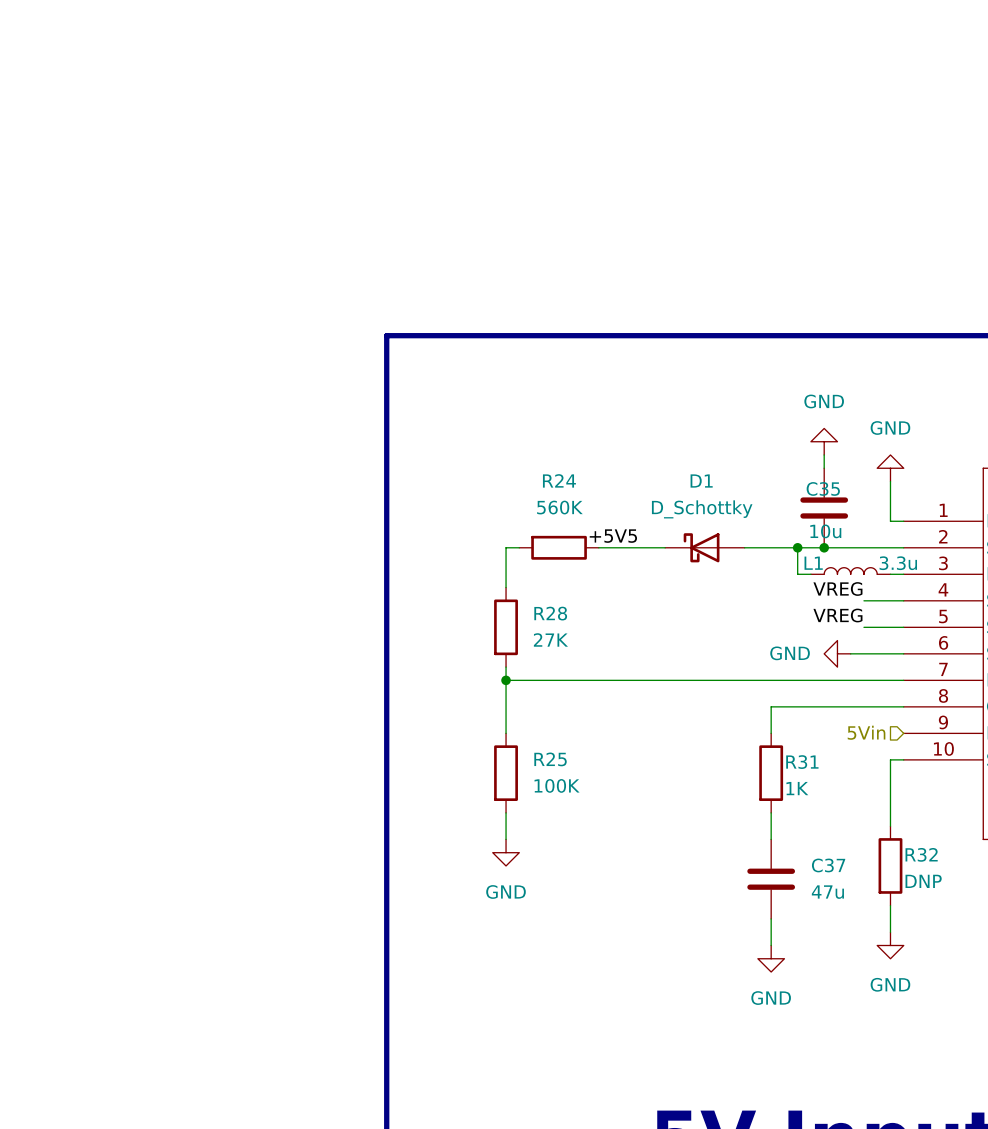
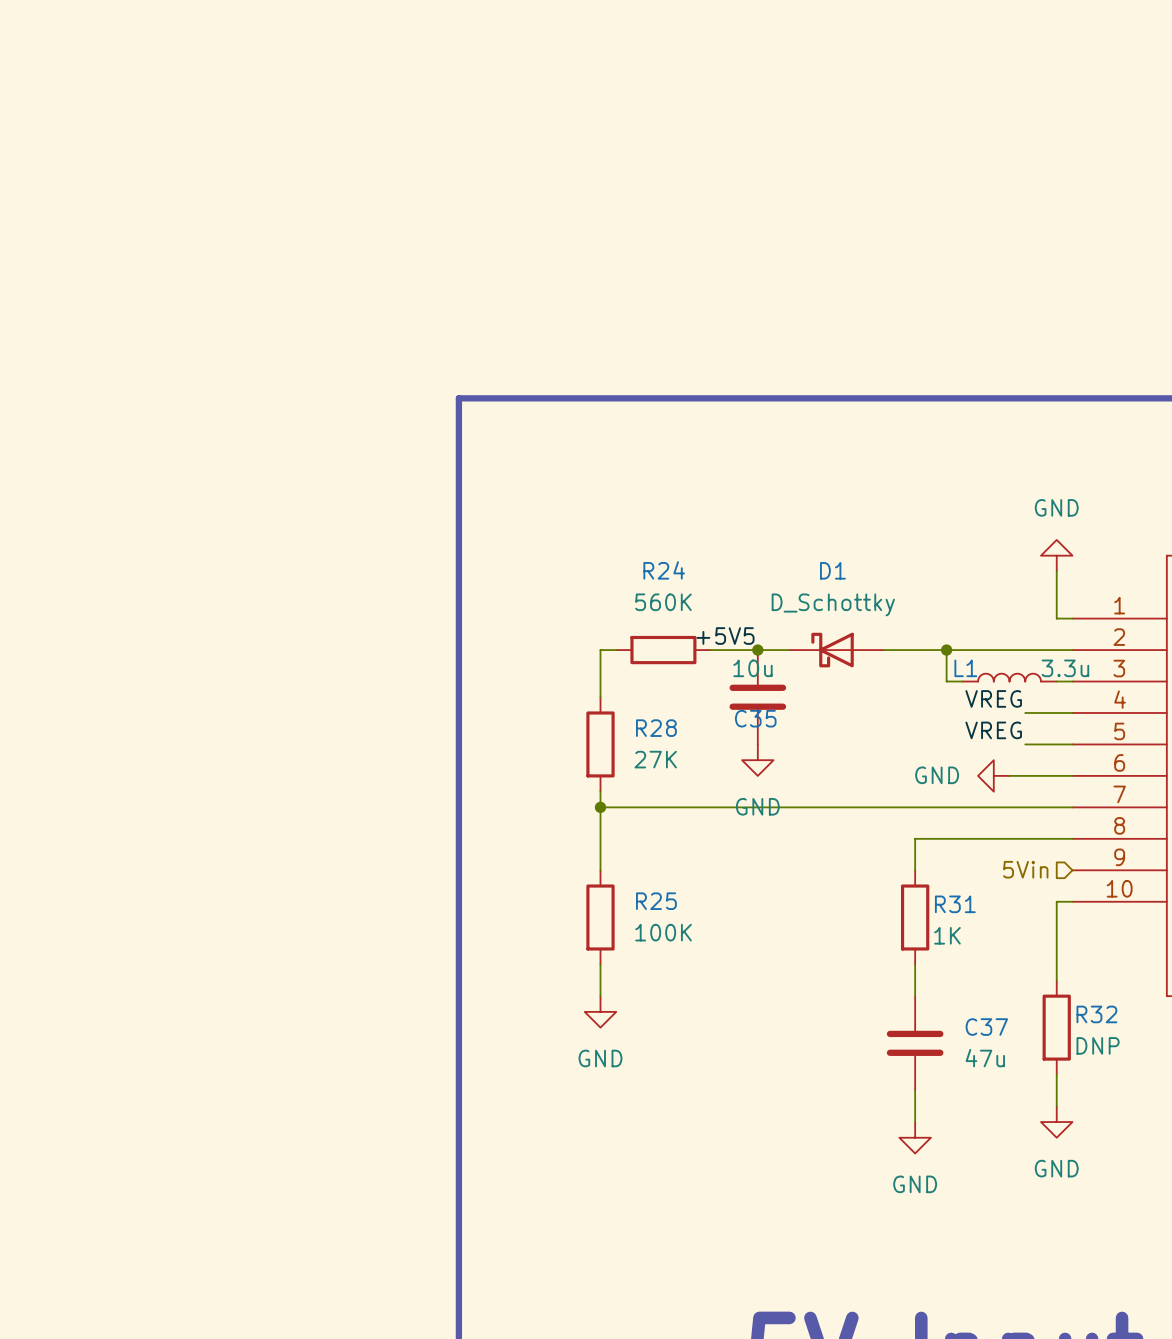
power symbol: GND (824, 441) -> none
wire: (824, 454) (824, 468) -> none
C35 name position: C35 (823, 488) -> C35 (755, 718)
C35 position: (824, 508) -> (757, 697)
C35 value position: 10u (825, 531) -> 10u (752, 668)
junction: none -> (757, 650)
junction: (824, 547) -> none
power symbol: none -> GND (757, 760)

